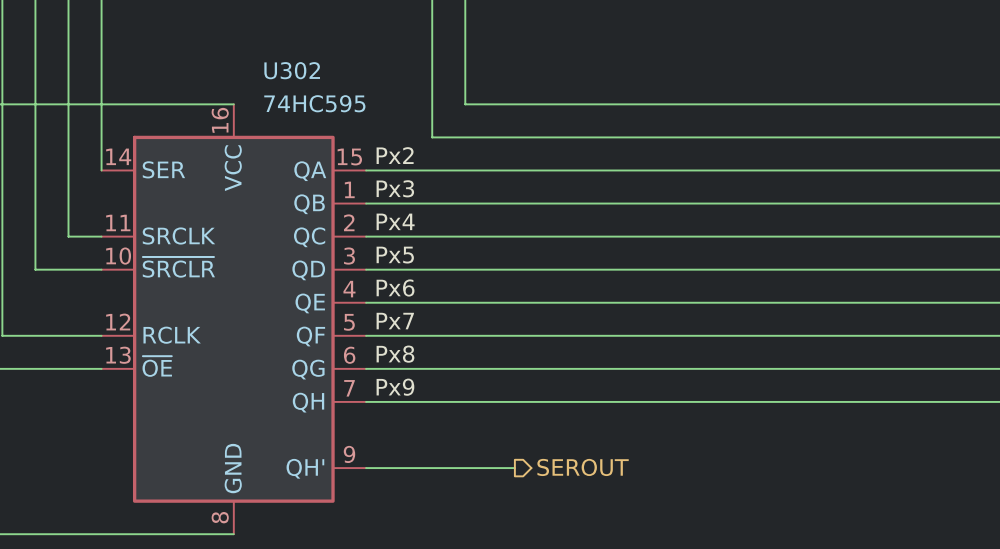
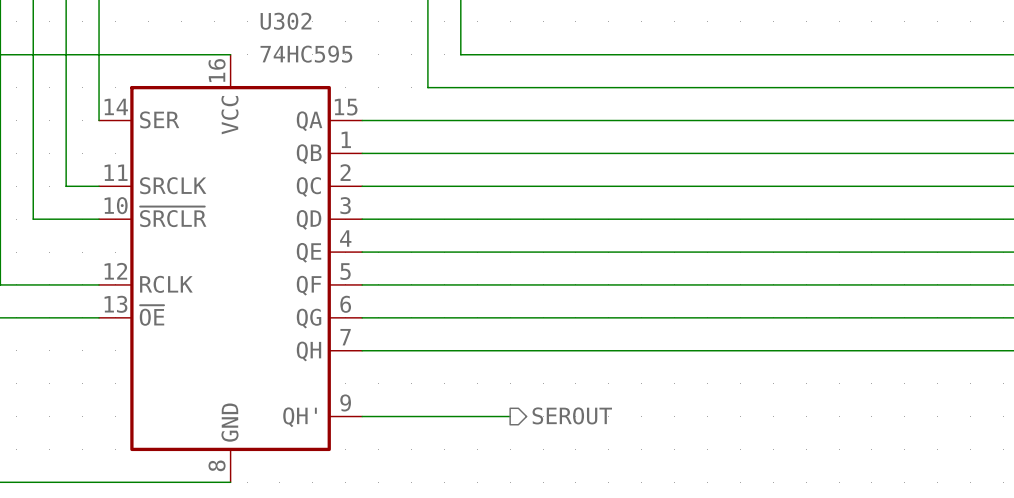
label: Px2 (395, 155) -> none
label: Px3 (395, 188) -> none
label: Px4 (395, 221) -> none
label: Px5 (395, 255) -> none
label: Px6 (395, 288) -> none
label: Px7 (395, 321) -> none
label: Px8 (395, 354) -> none
label: Px9 (395, 387) -> none

